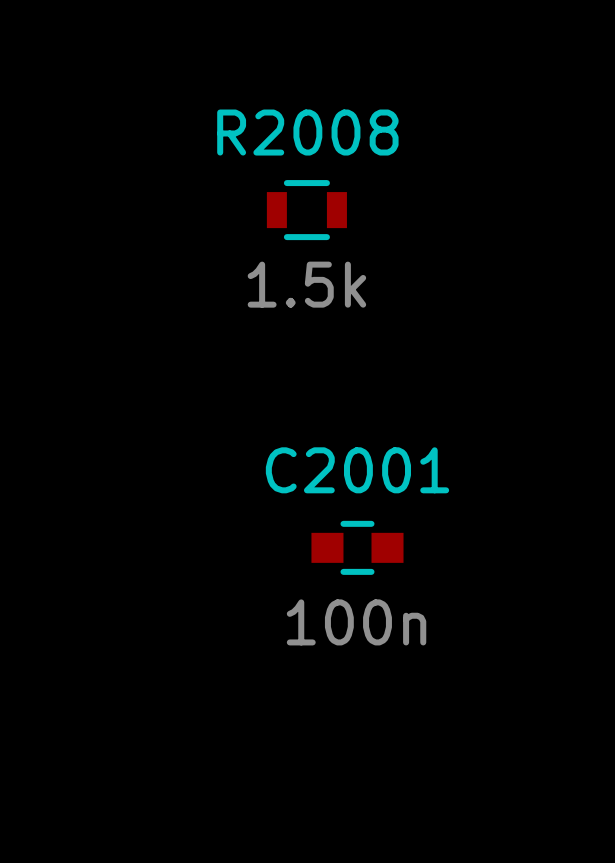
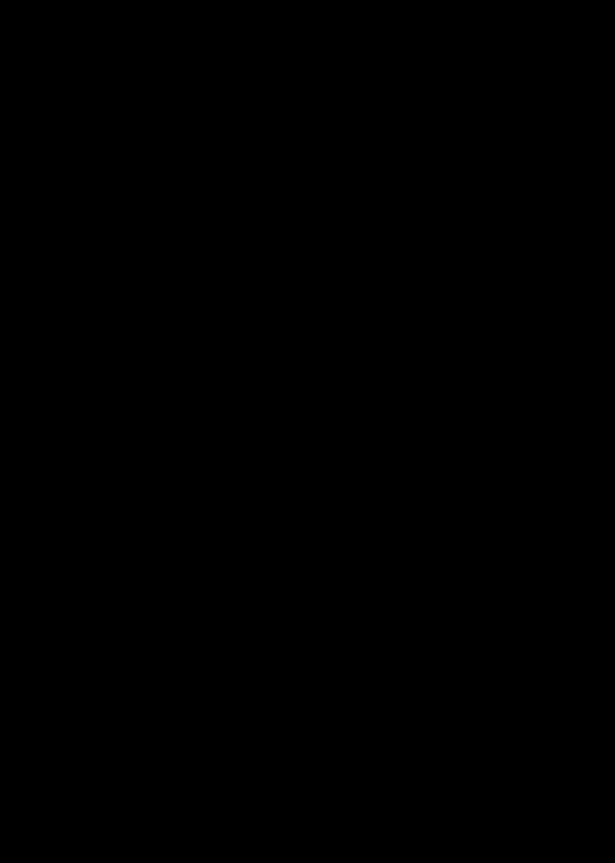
R2008: 1.5k (306, 210) -> none
C2001: 100n (357, 547) -> none

